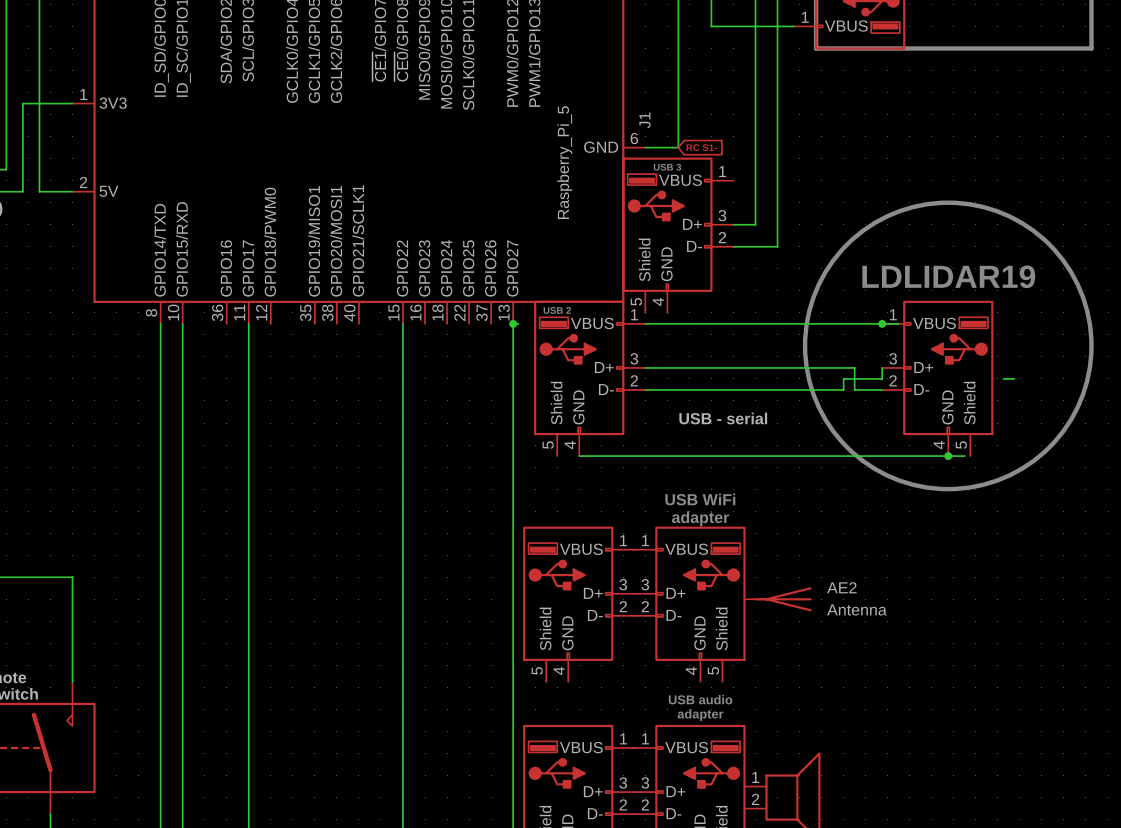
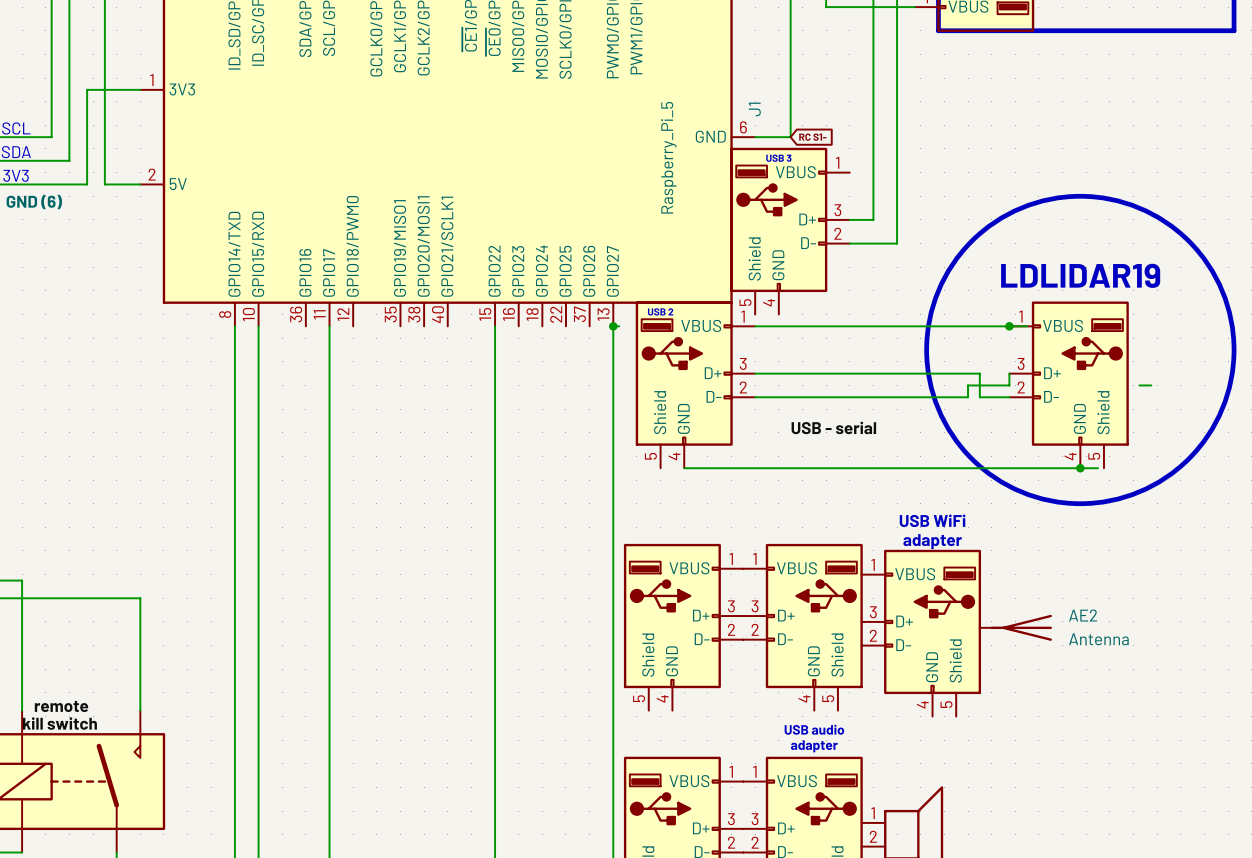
text position: USB WiFi (700, 499) -> USB WiFi (932, 520)
text position: adapter (700, 518) -> adapter (932, 541)
AE2 position: (778, 599) -> (1015, 627)
part: none -> (921, 633)

